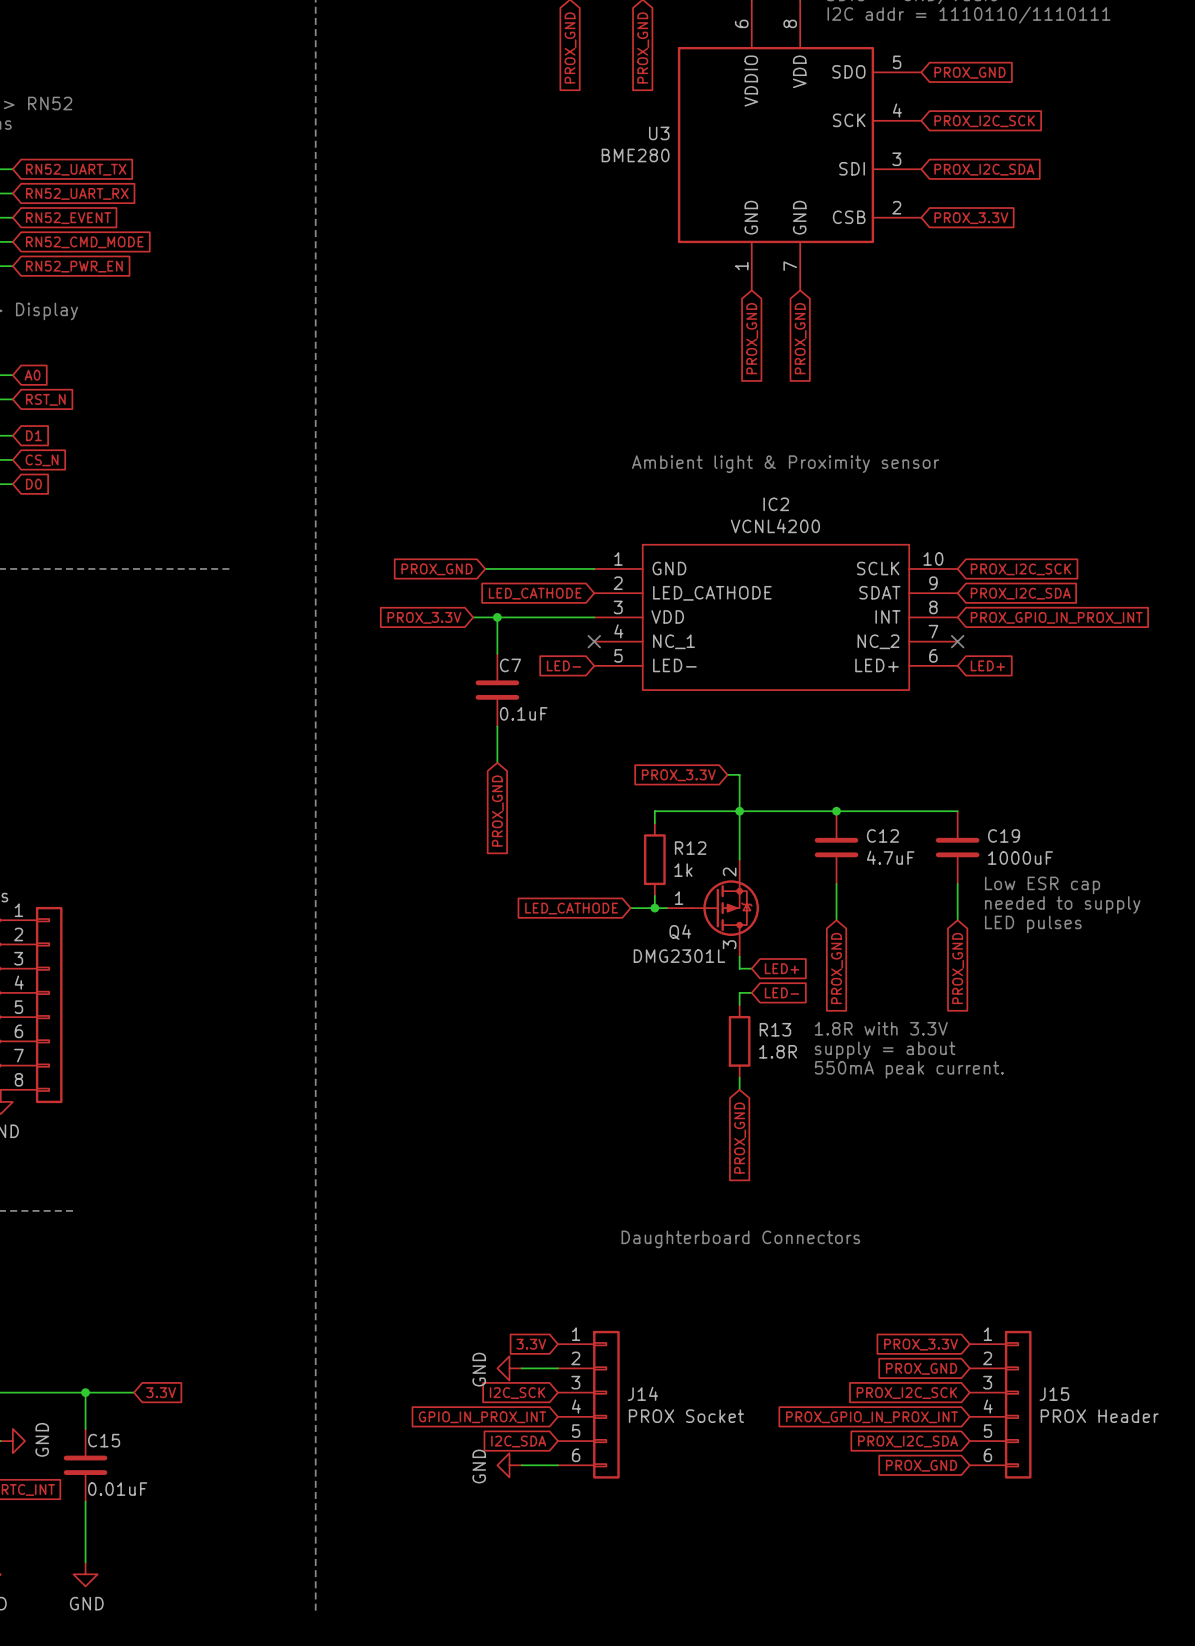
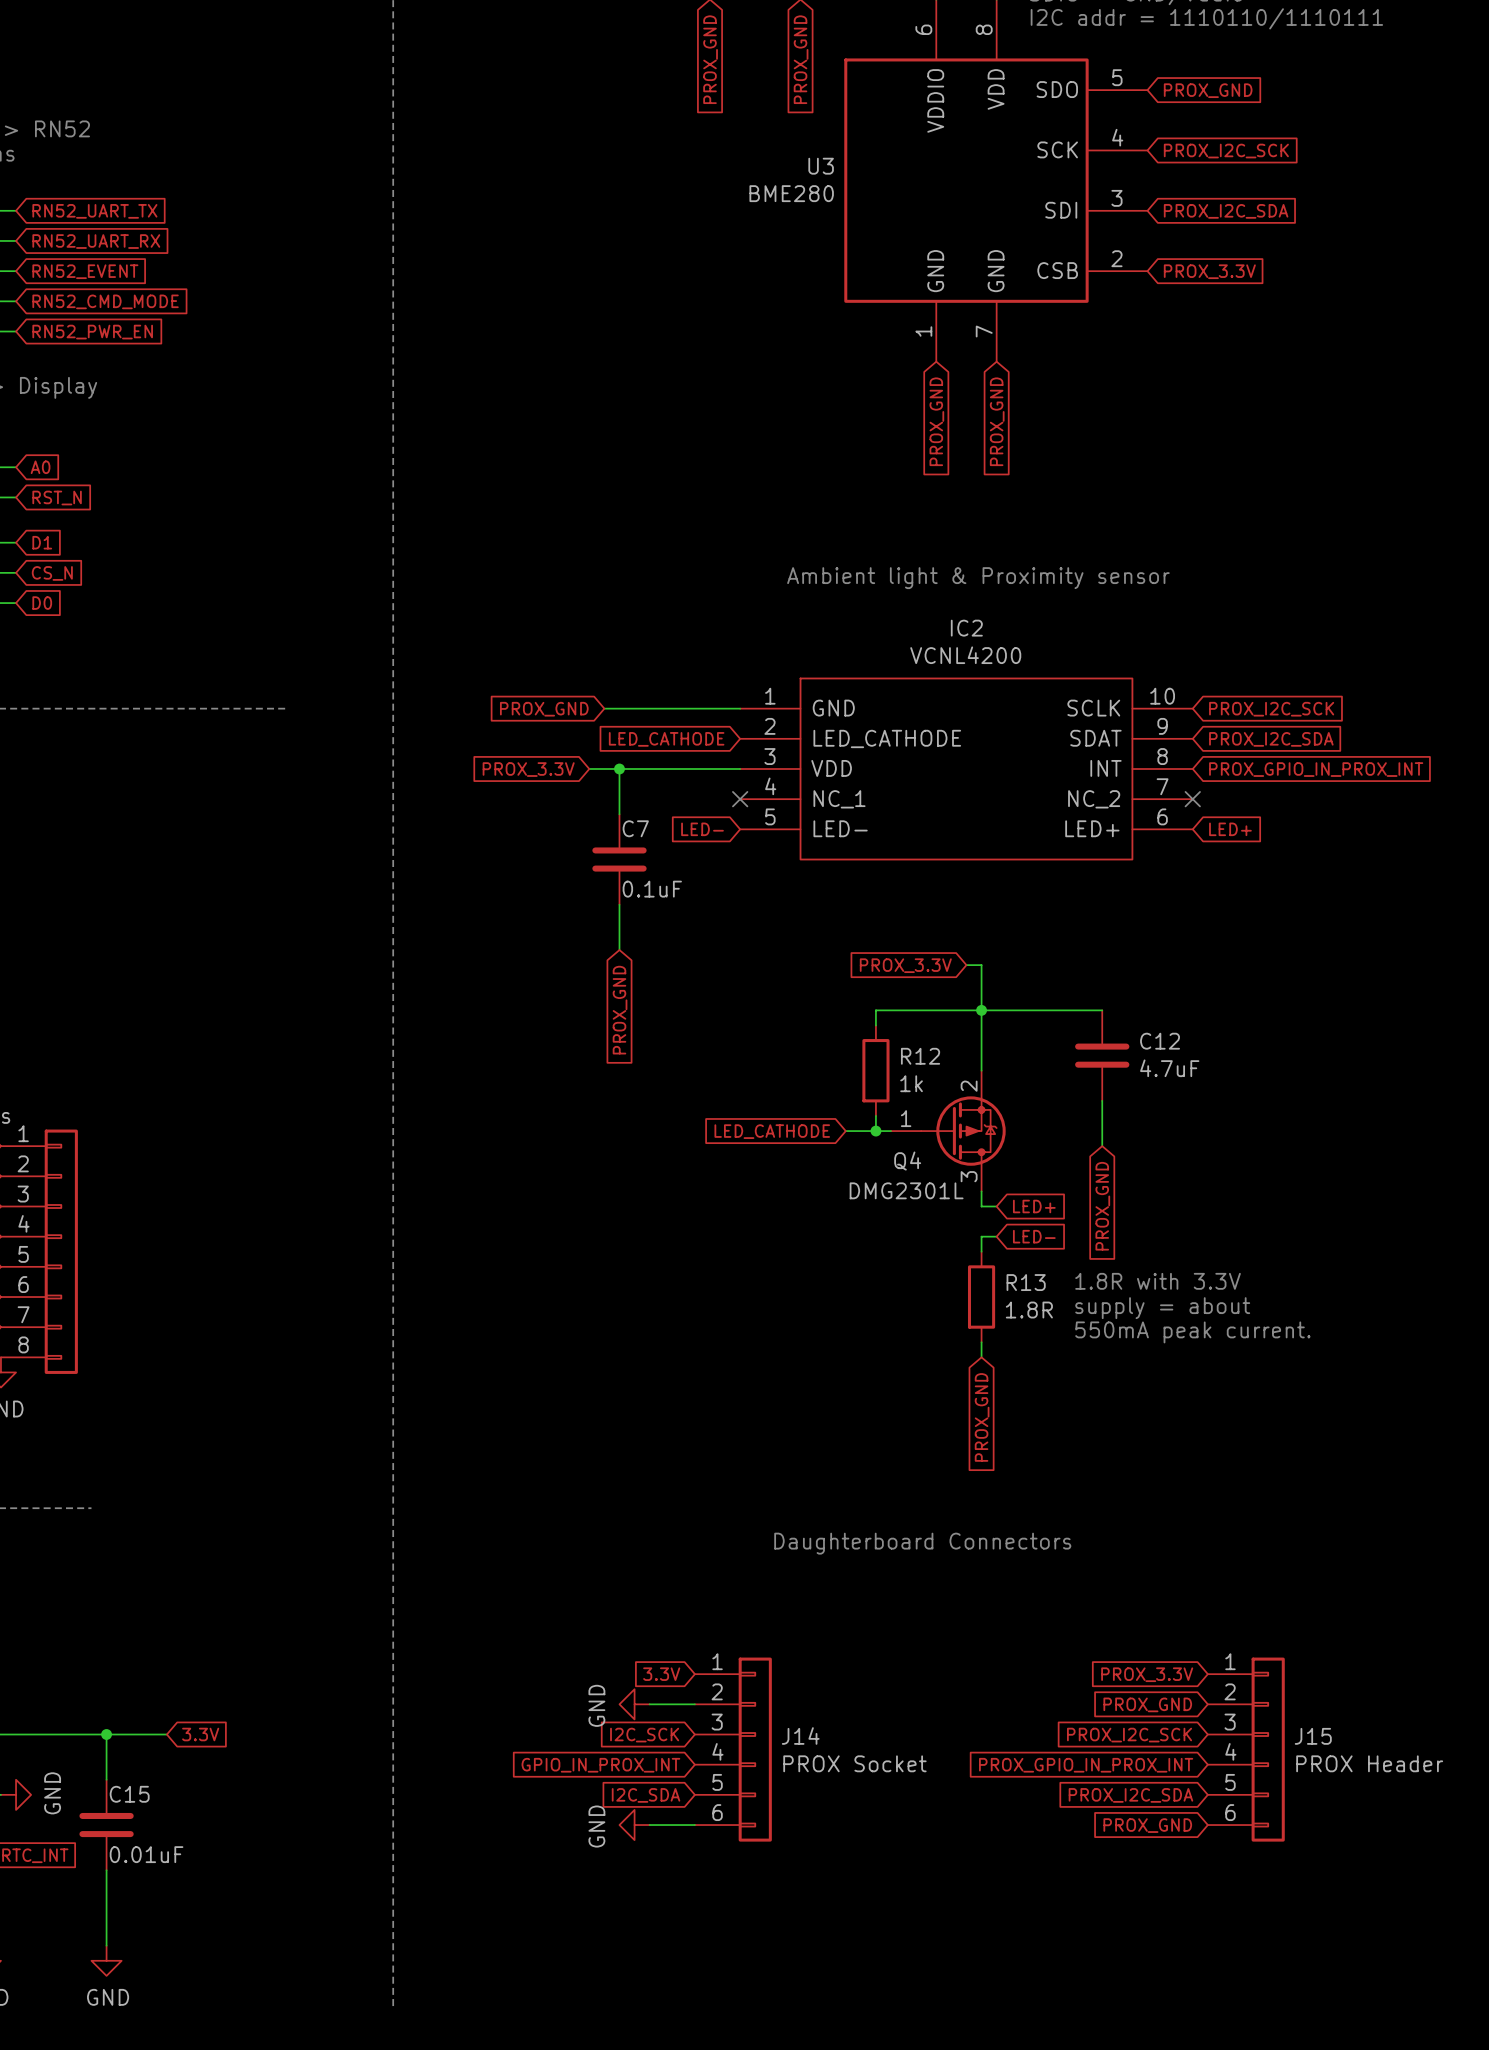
wire: (727, 774) (739, 774) (739, 859) -> (966, 965) (981, 965) (981, 1070)
global label position: PROX_3.3V (678, 775) -> PROX_3.3V (905, 965)
wire: (703, 811) (654, 811) (654, 823) -> (875, 1010) (875, 1025)
junction: (739, 811) -> none
junction: none -> (981, 1010)
junction: (836, 811) -> none
wire: (884, 811) (957, 811) -> none
C12 position: (836, 847) -> (1102, 1055)
C19: 1000uF (957, 847) -> none
R12 position: (654, 859) -> (875, 1070)
wire: (836, 883) (836, 920) -> (1102, 1100) (1102, 1146)
wire: (957, 883) (957, 920) -> none
text: Low ESR cap (1042, 885) -> none
wire: (654, 896) (654, 908) -> (875, 1115) (875, 1131)
text: needed to supply (1062, 904) -> none
global label position: LED_CATHODE (571, 908) -> LED_CATHODE (772, 1131)
junction position: (654, 908) -> (875, 1131)
Q4 position: (712, 908) -> (948, 1131)
text: LED pulses (1033, 924) -> none
wire: (739, 956) (739, 968) (751, 968) -> (981, 1191) (981, 1206) (996, 1206)
global label position: LED+ (782, 968) -> LED+ (1034, 1206)
global label: PROX_GND (836, 968) -> none
global label: none -> PROX_GND (1102, 1206)
global label: PROX_GND (958, 968) -> none
wire: (751, 992) (739, 992) (739, 1005) -> (996, 1236) (981, 1236) (981, 1251)
global label position: LED- (782, 992) -> LED- (1034, 1236)
text position: 1.8R with 3.3V (881, 1028) -> 1.8R with 3.3V (1158, 1281)
R13 position: (739, 1041) -> (981, 1297)
text position: supply = about (885, 1050) -> supply = about (1162, 1308)
text position: 550mA peak current. (909, 1069) -> 550mA peak current. (1192, 1332)
wire: (739, 1077) (739, 1089) -> (981, 1342) (981, 1357)
global label position: PROX_GND (740, 1138) -> PROX_GND (982, 1417)

